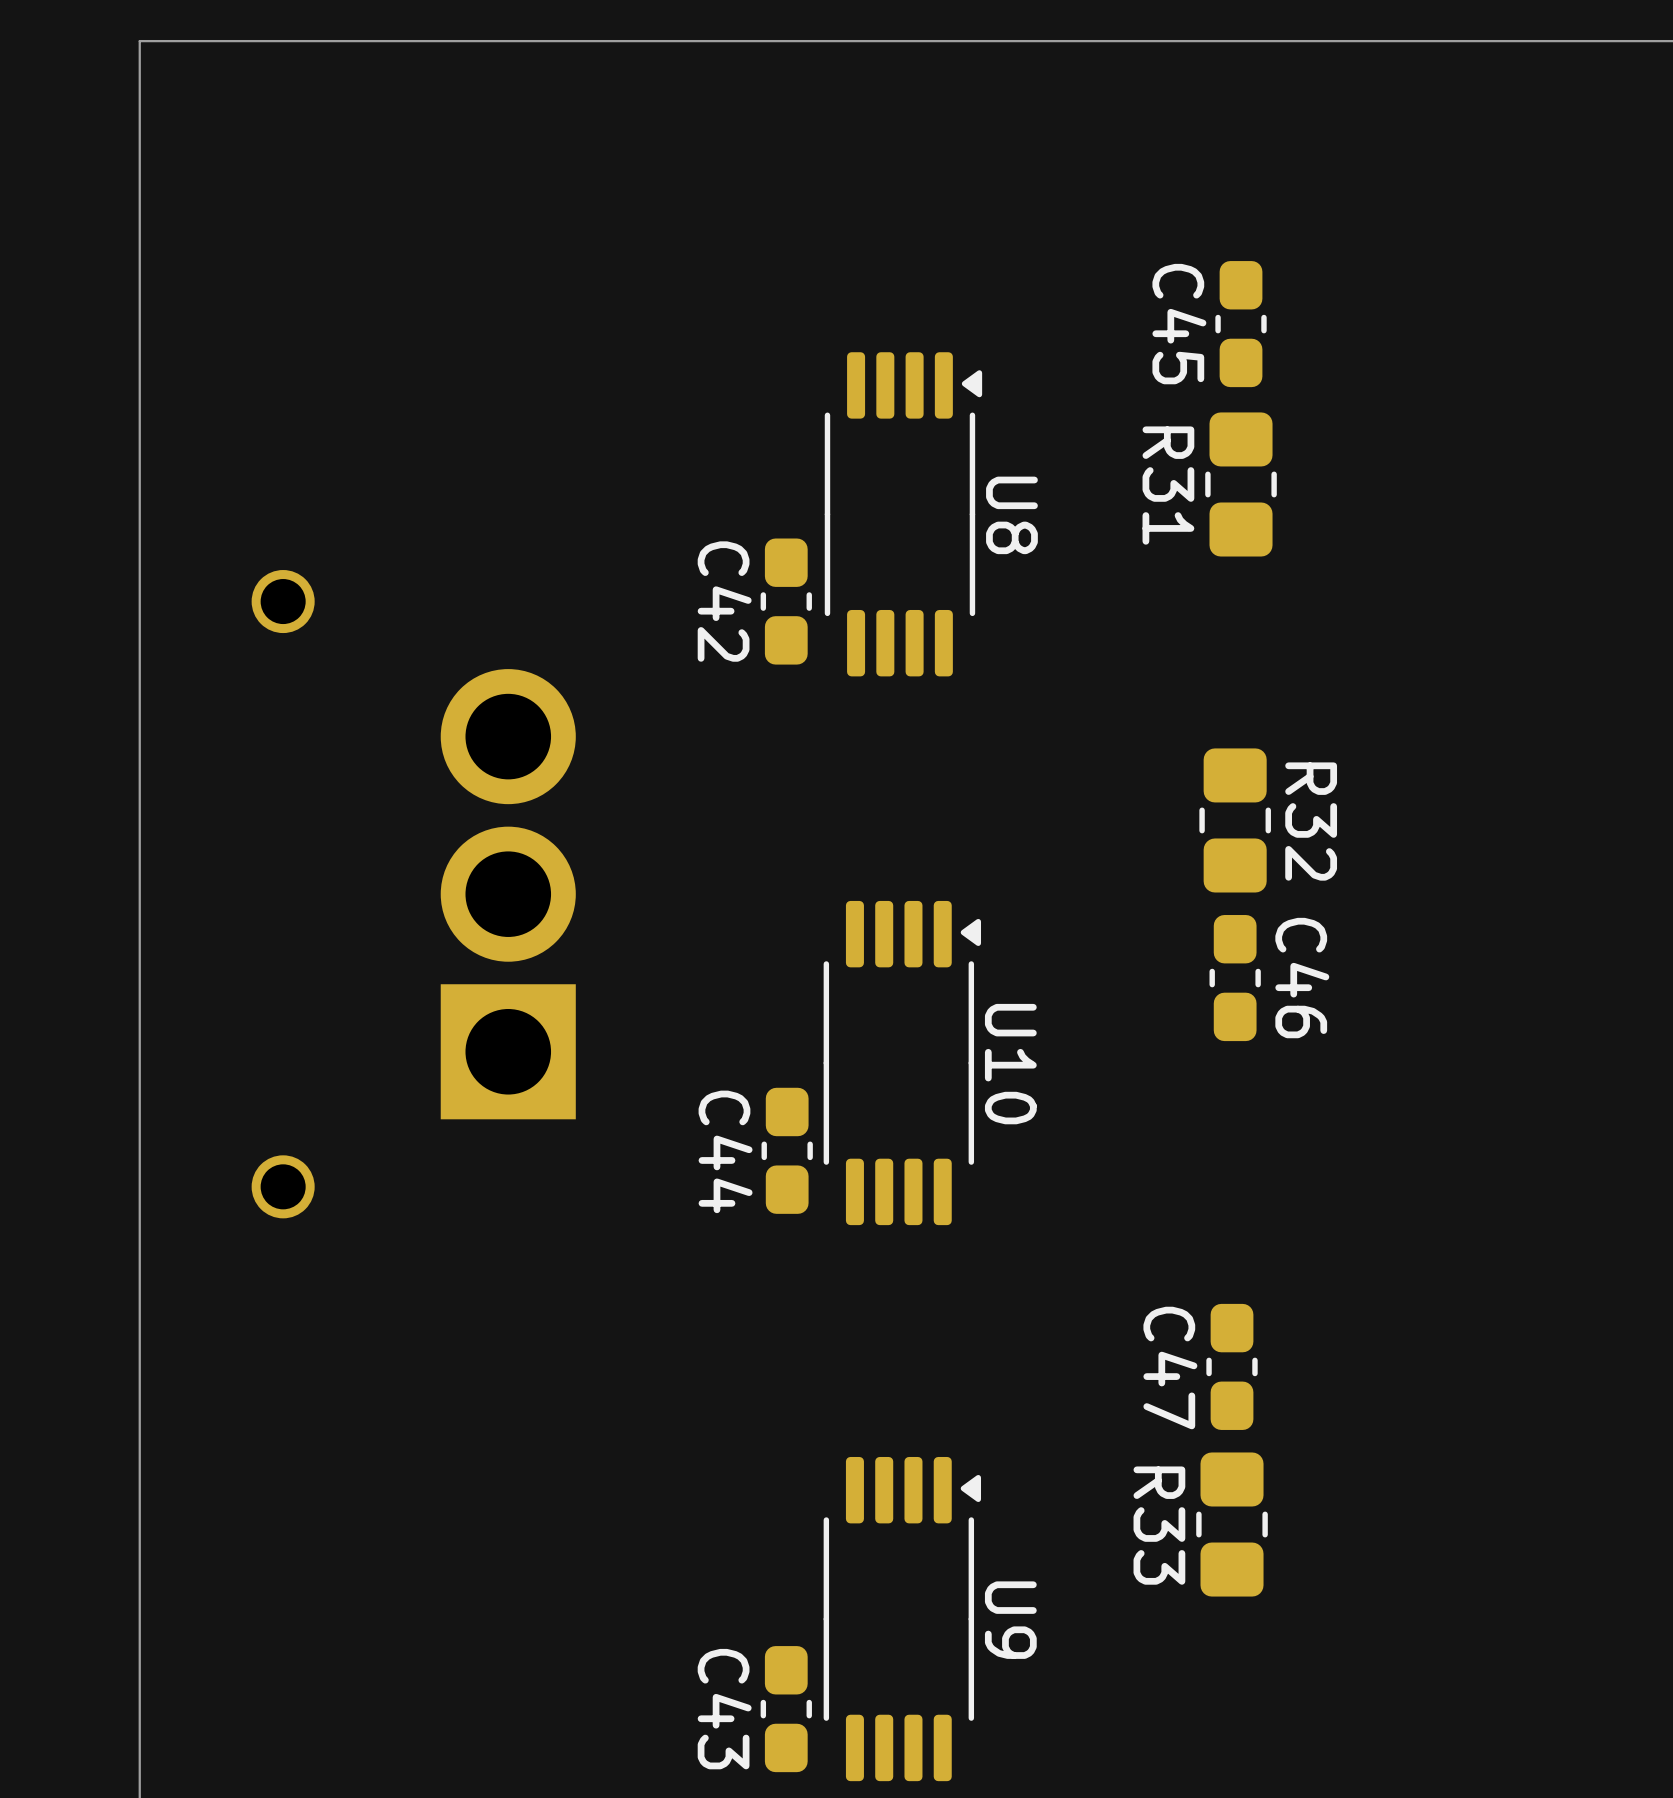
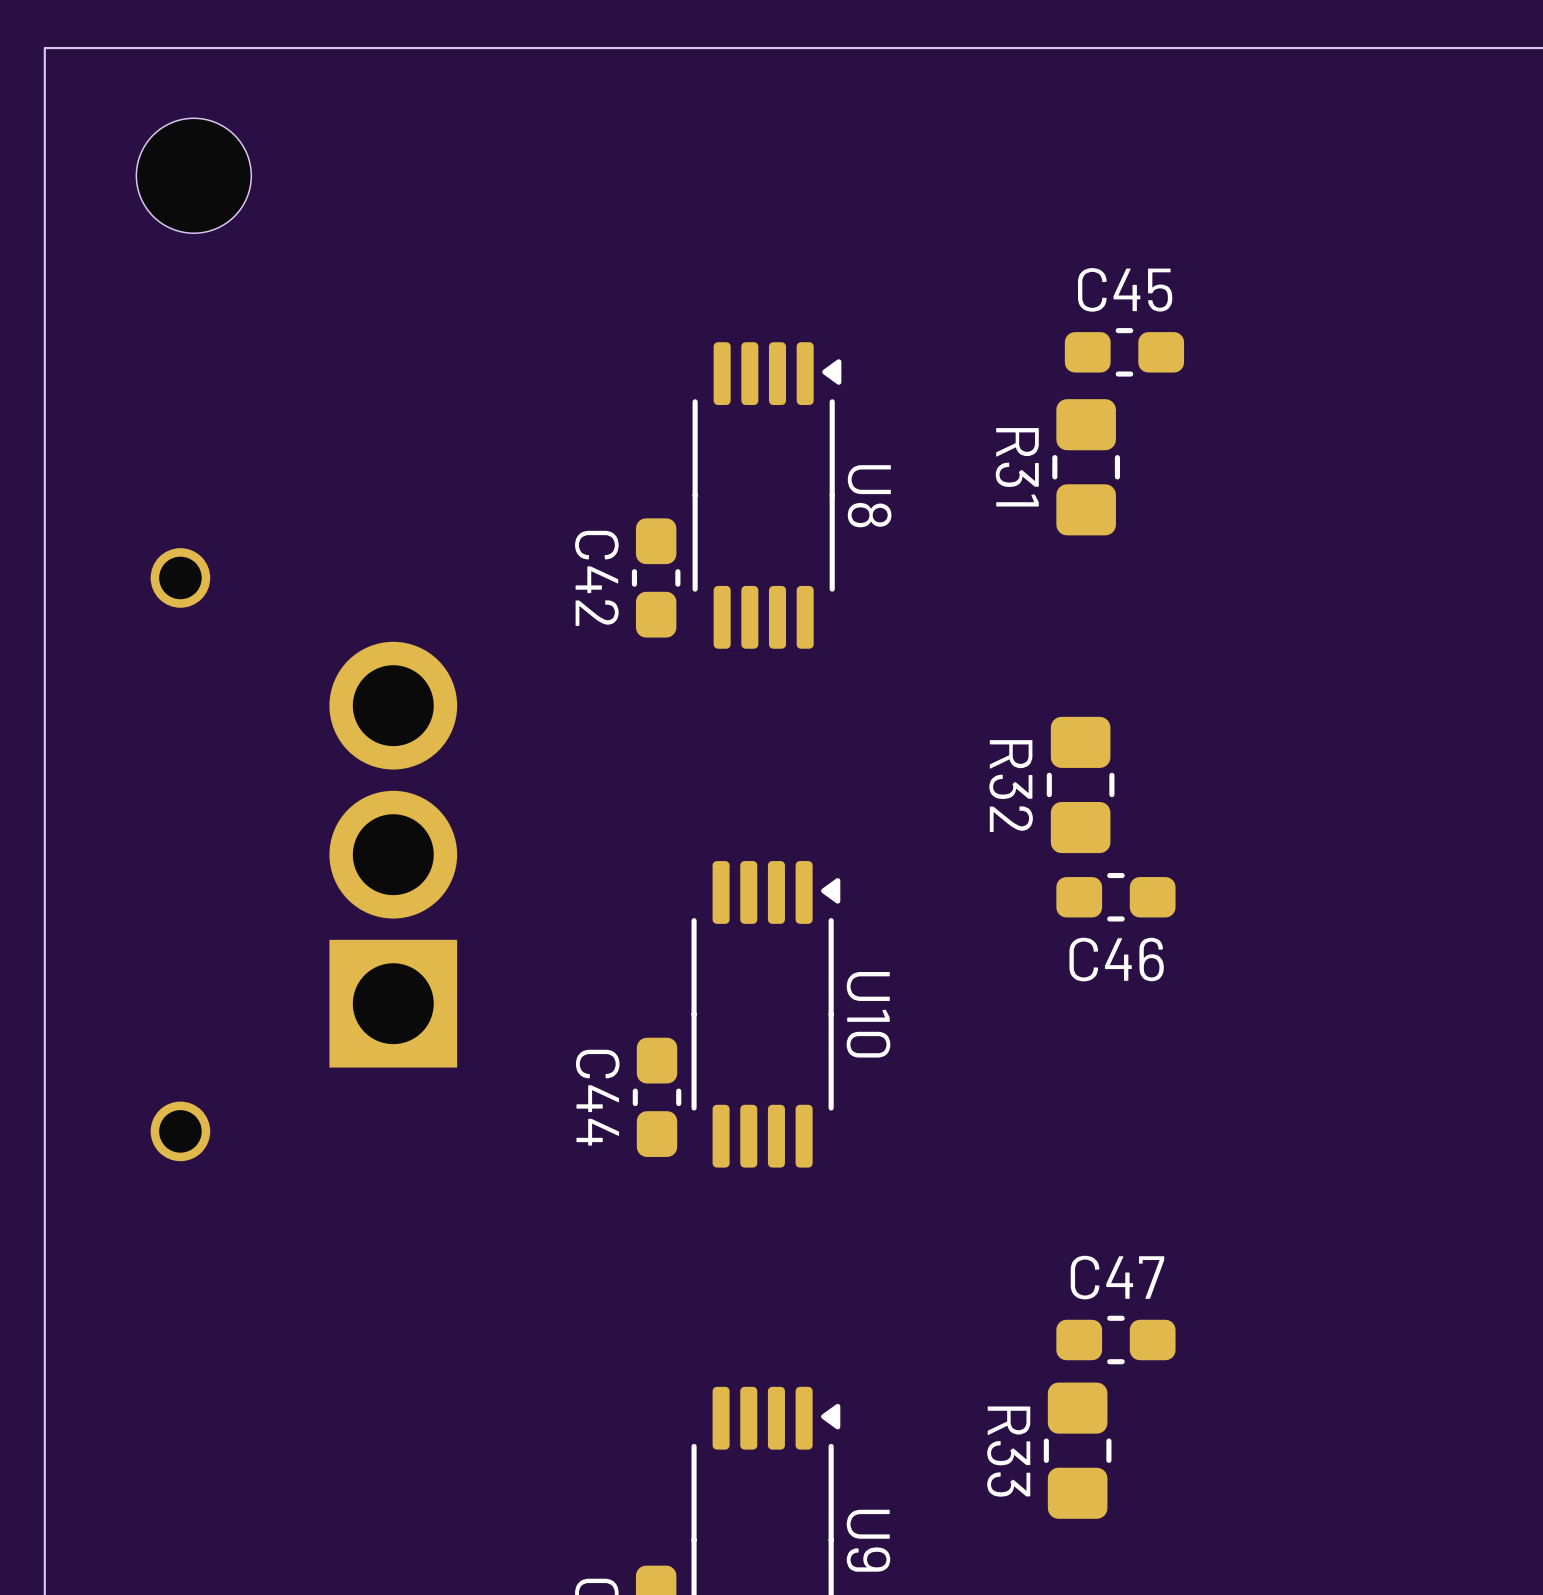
part: none -> (193, 175)
C45 rotation: 0° (1241, 324) -> 90° clockwise (1124, 352)
R32 name position: R32 (1311, 821) -> R32 (1011, 786)
C46 rotation: 0° (1235, 978) -> 90° clockwise (1115, 897)
C47 rotation: 0° (1232, 1366) -> 90° clockwise (1115, 1340)

